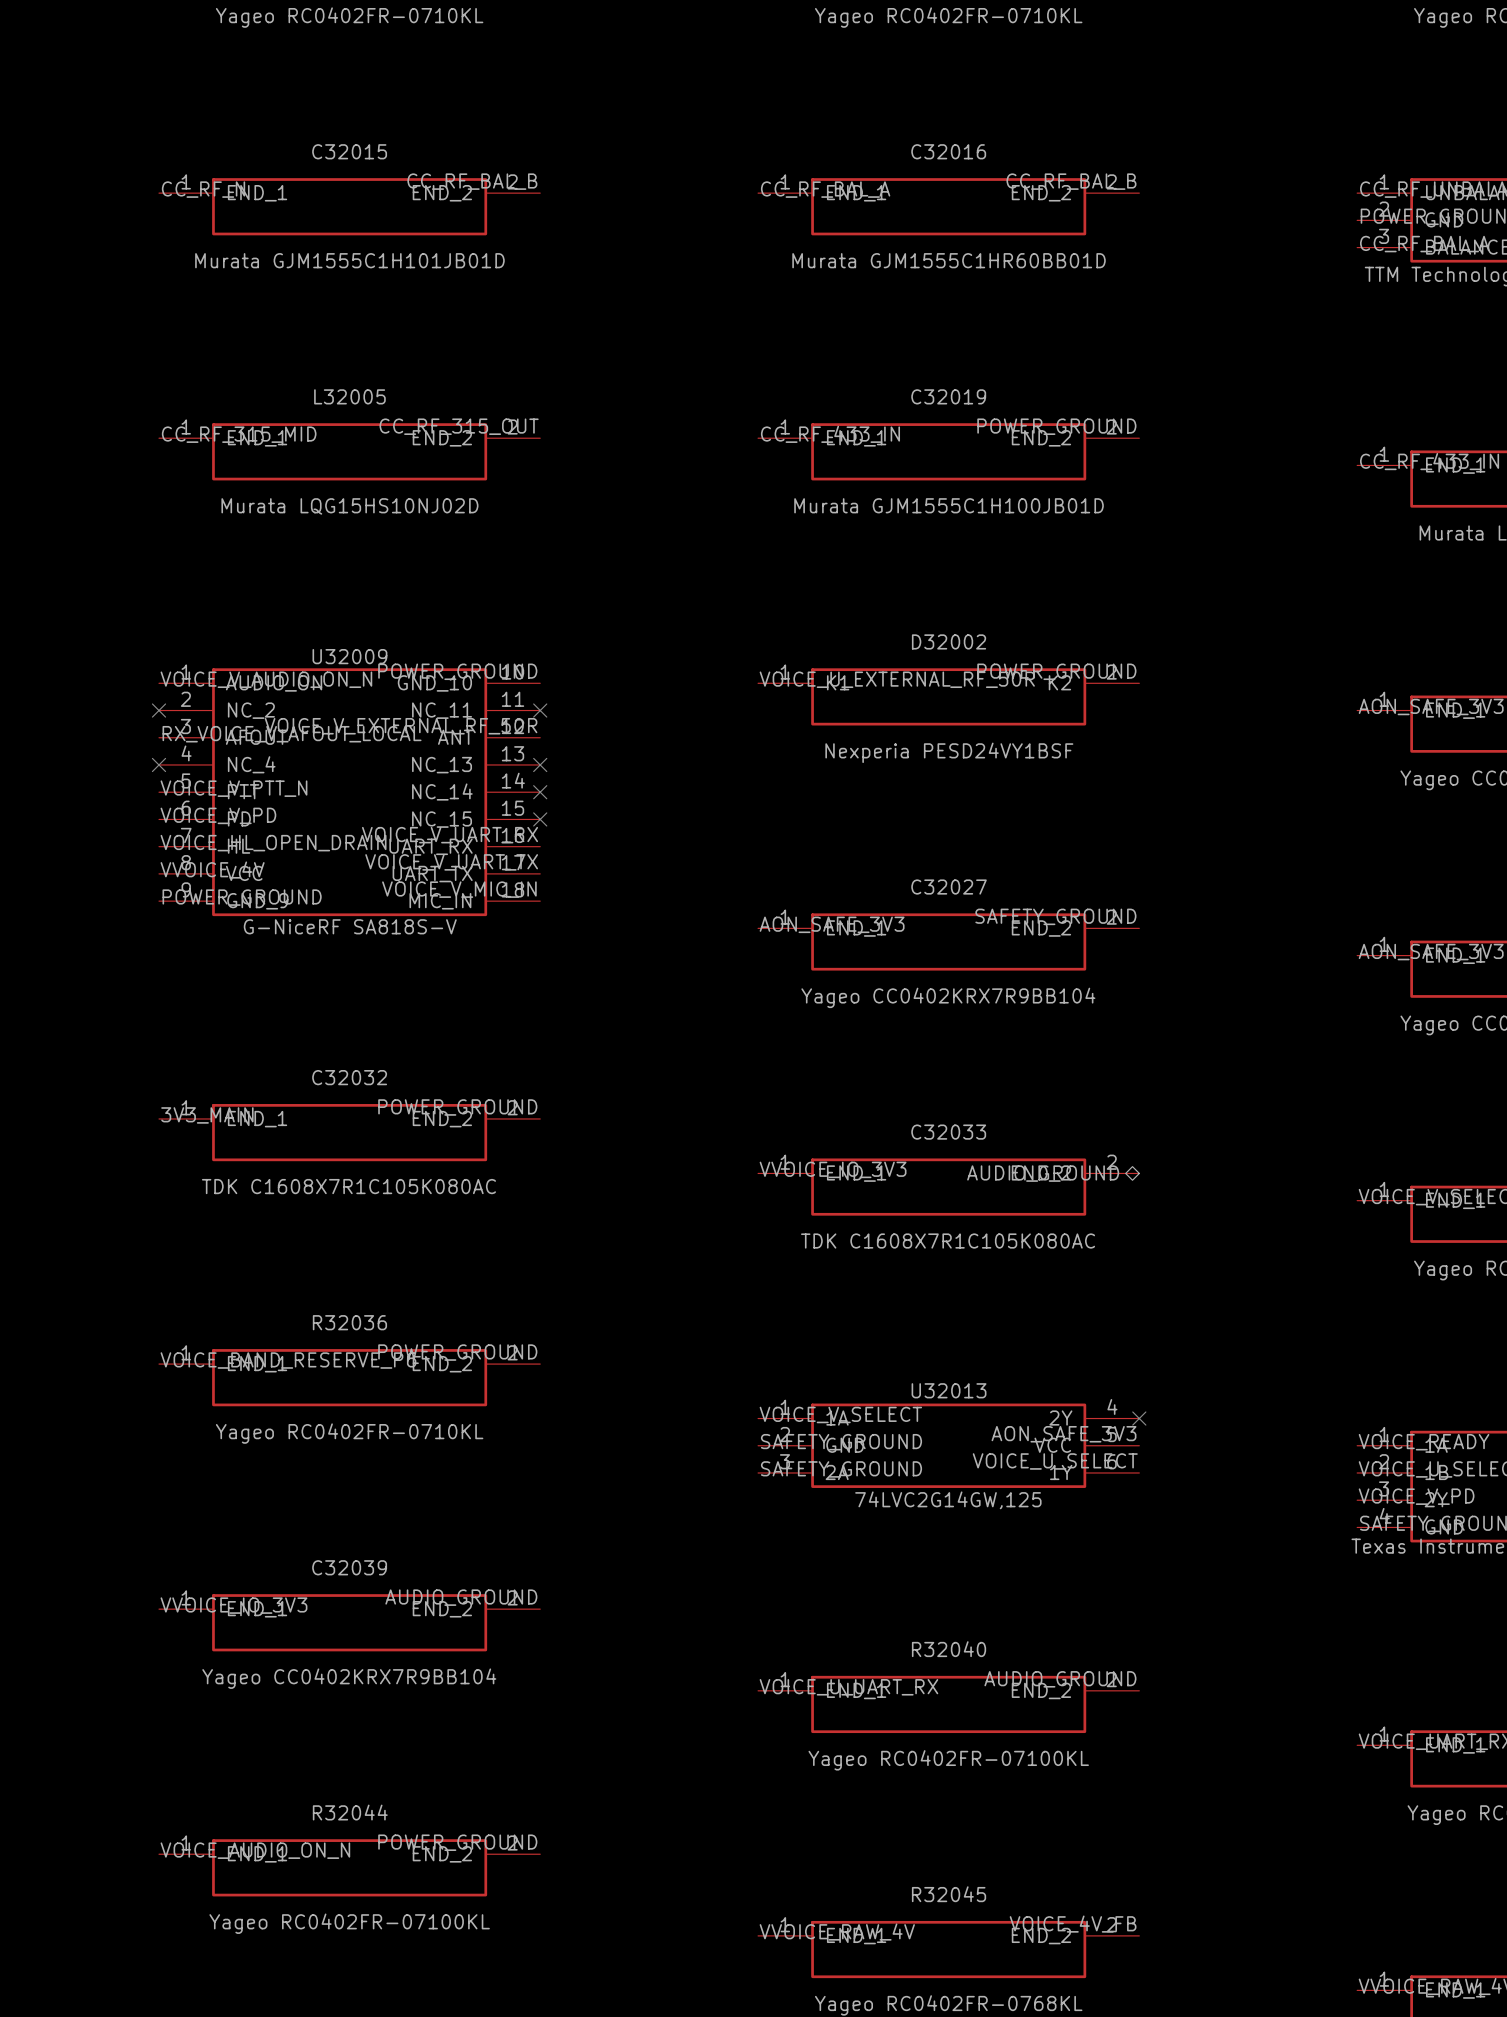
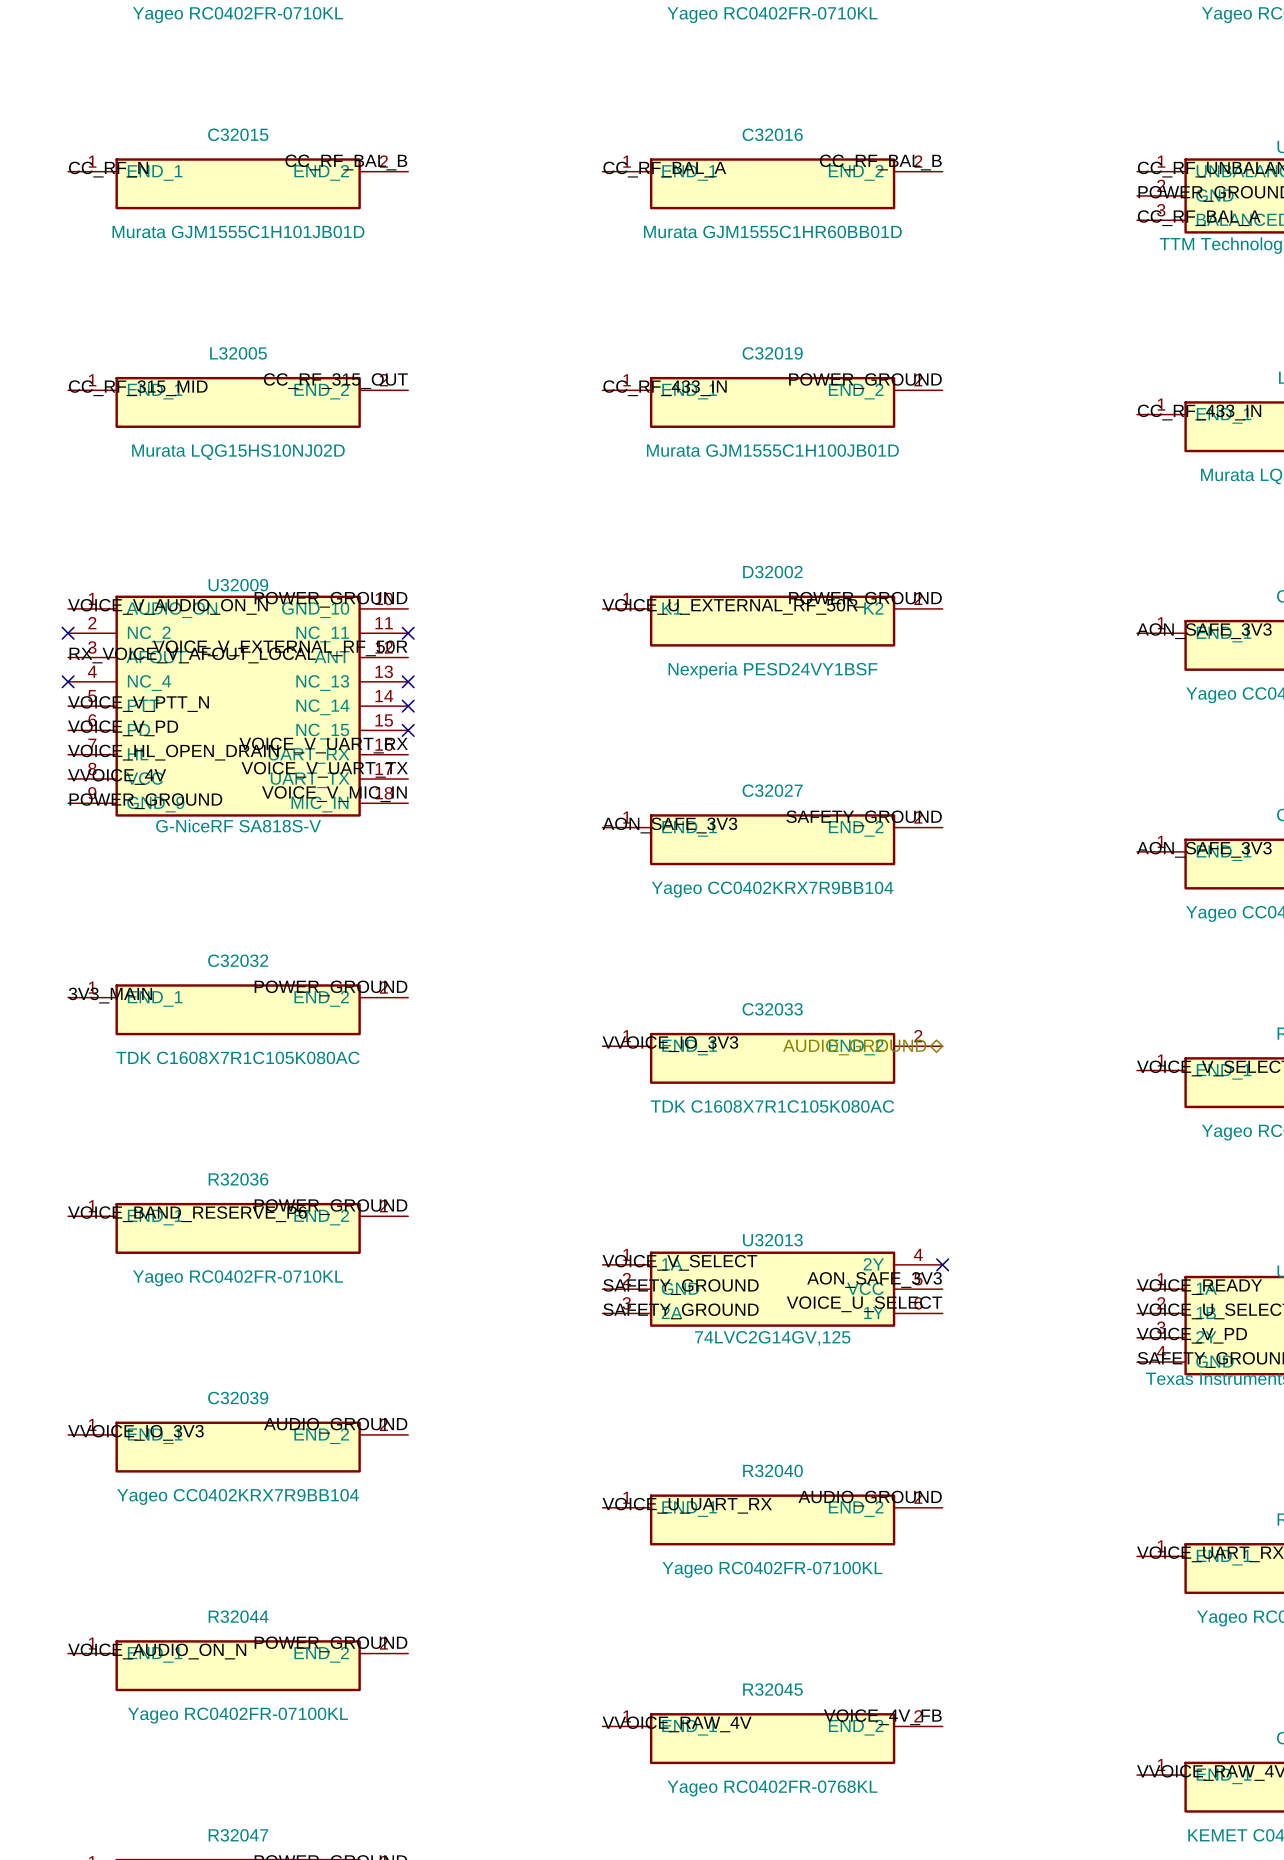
U32013 value: 74LVC2G14GW,125 (948, 1500) -> 74LVC2G14GV,125 (772, 1338)

